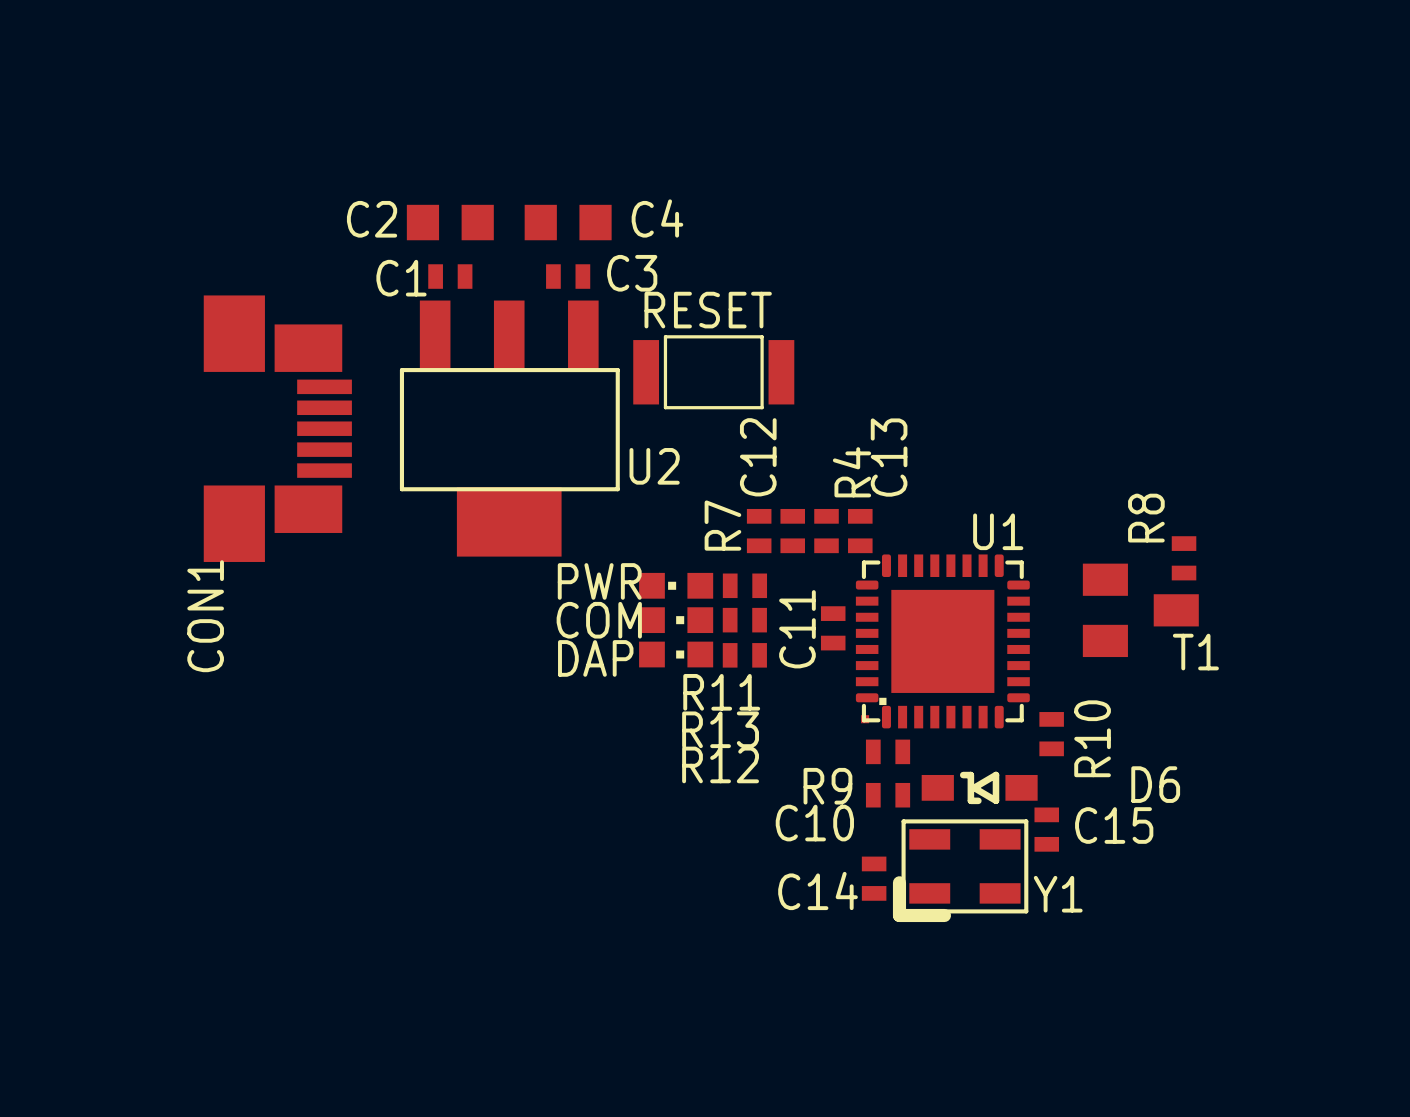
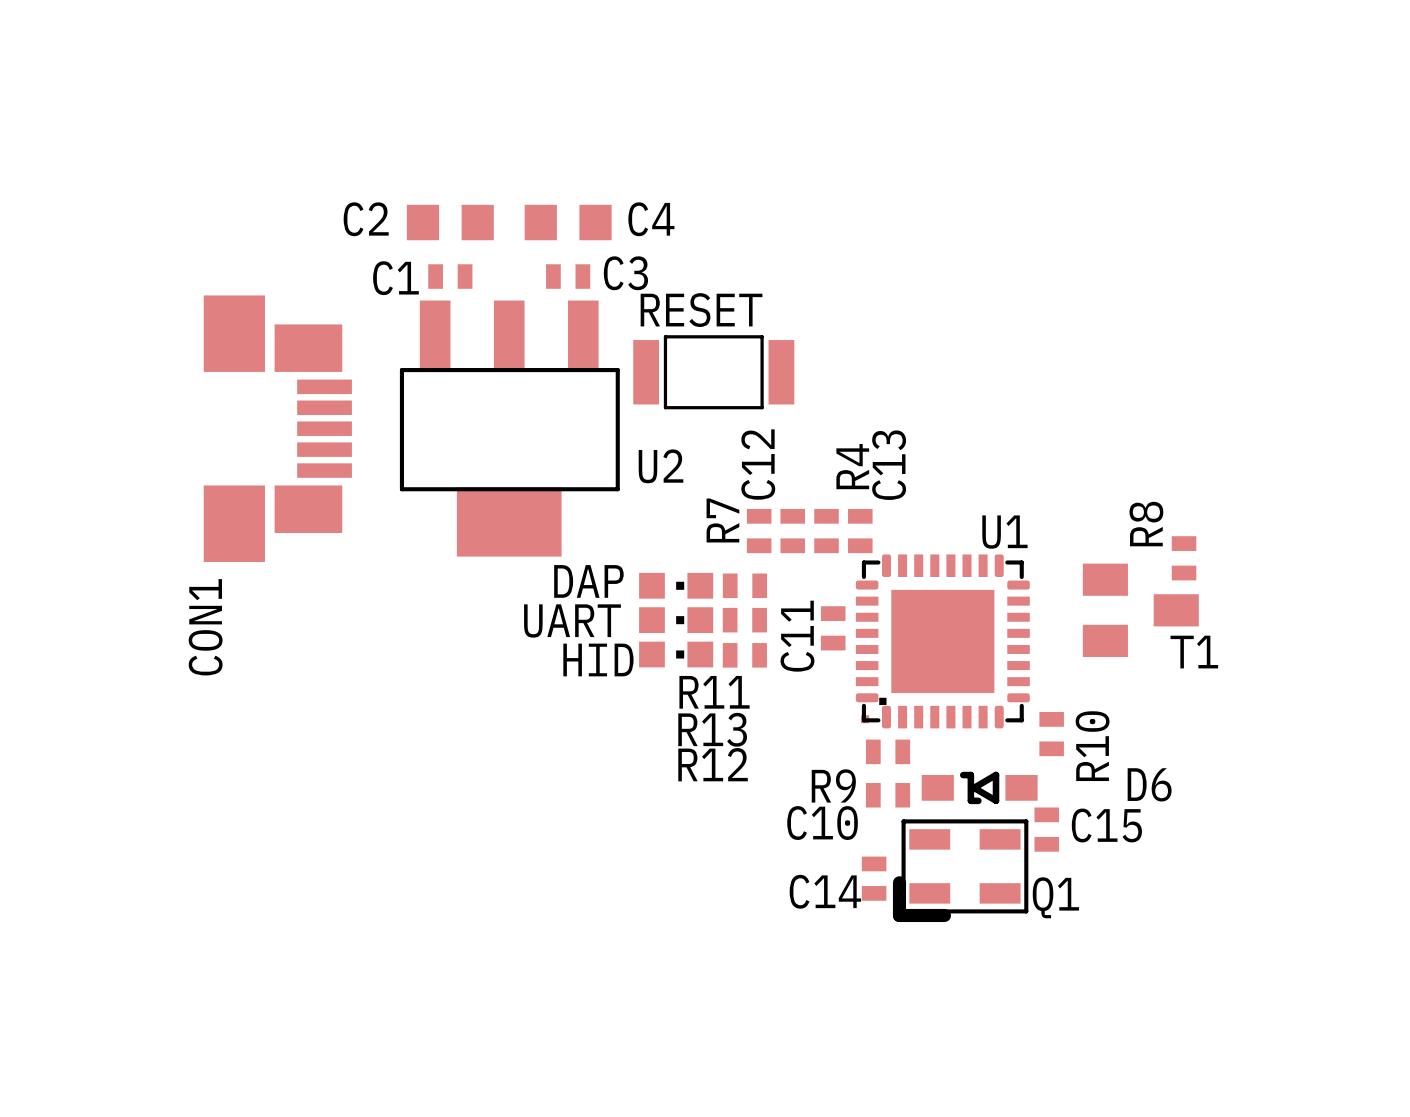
text: PWR (599, 581) -> DAP (588, 581)
part rotation: 0° (676, 585) -> 180° (676, 585)
text: none -> UART (572, 621)
text: COM (599, 620) -> none
text: DAP (595, 658) -> HID (598, 659)
Y1 name: Y1 (1058, 894) -> Q1 (1055, 897)

